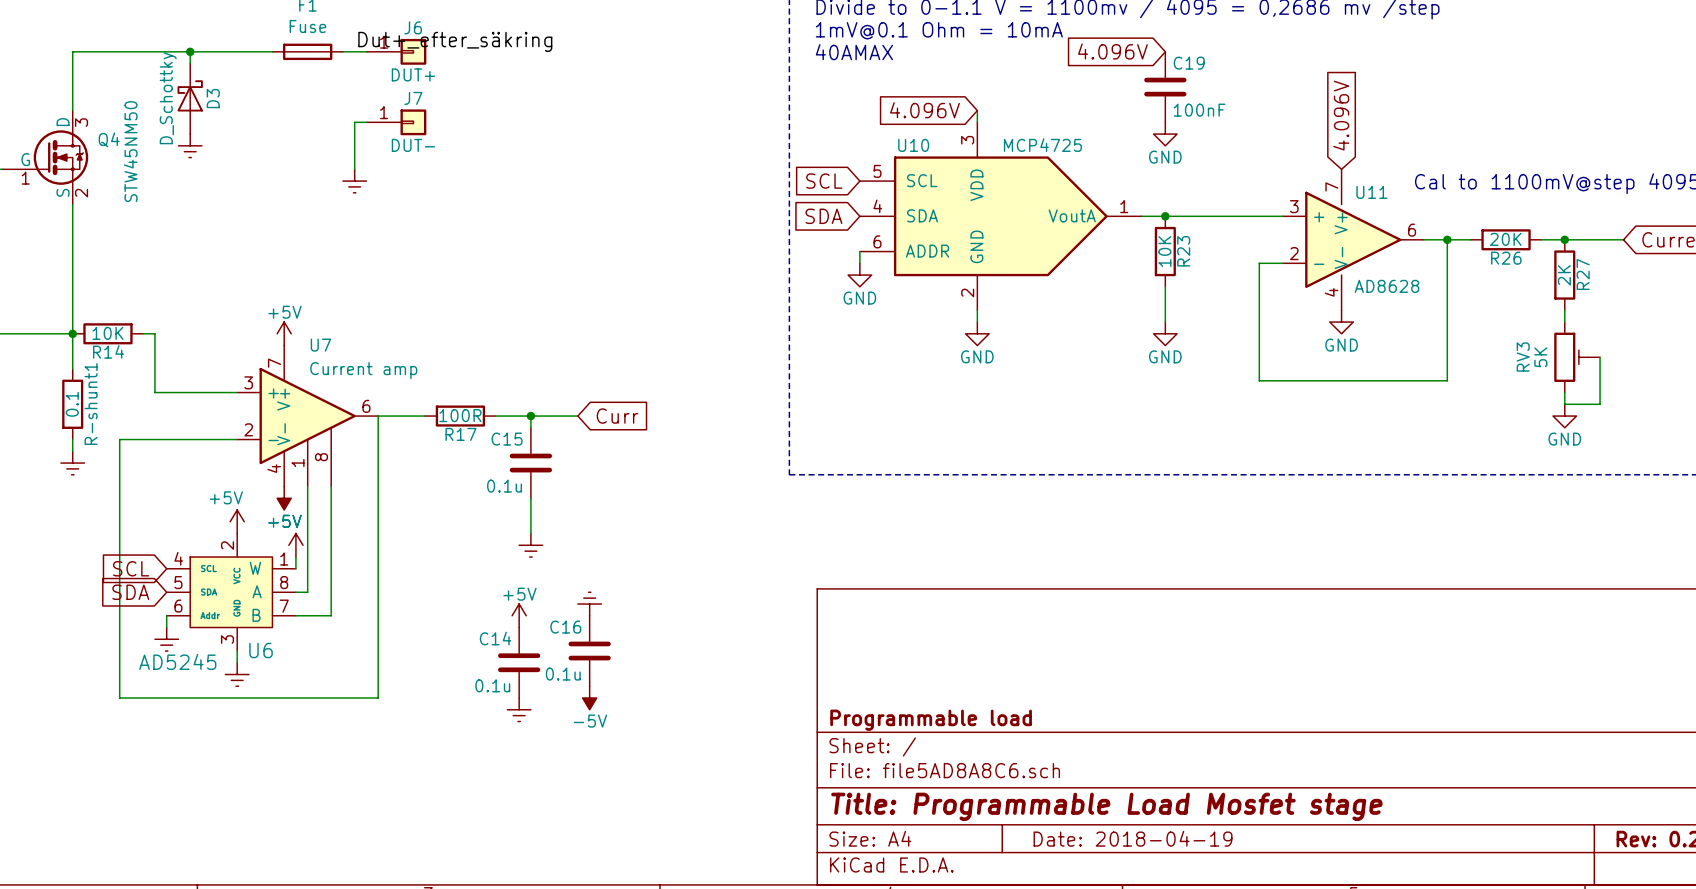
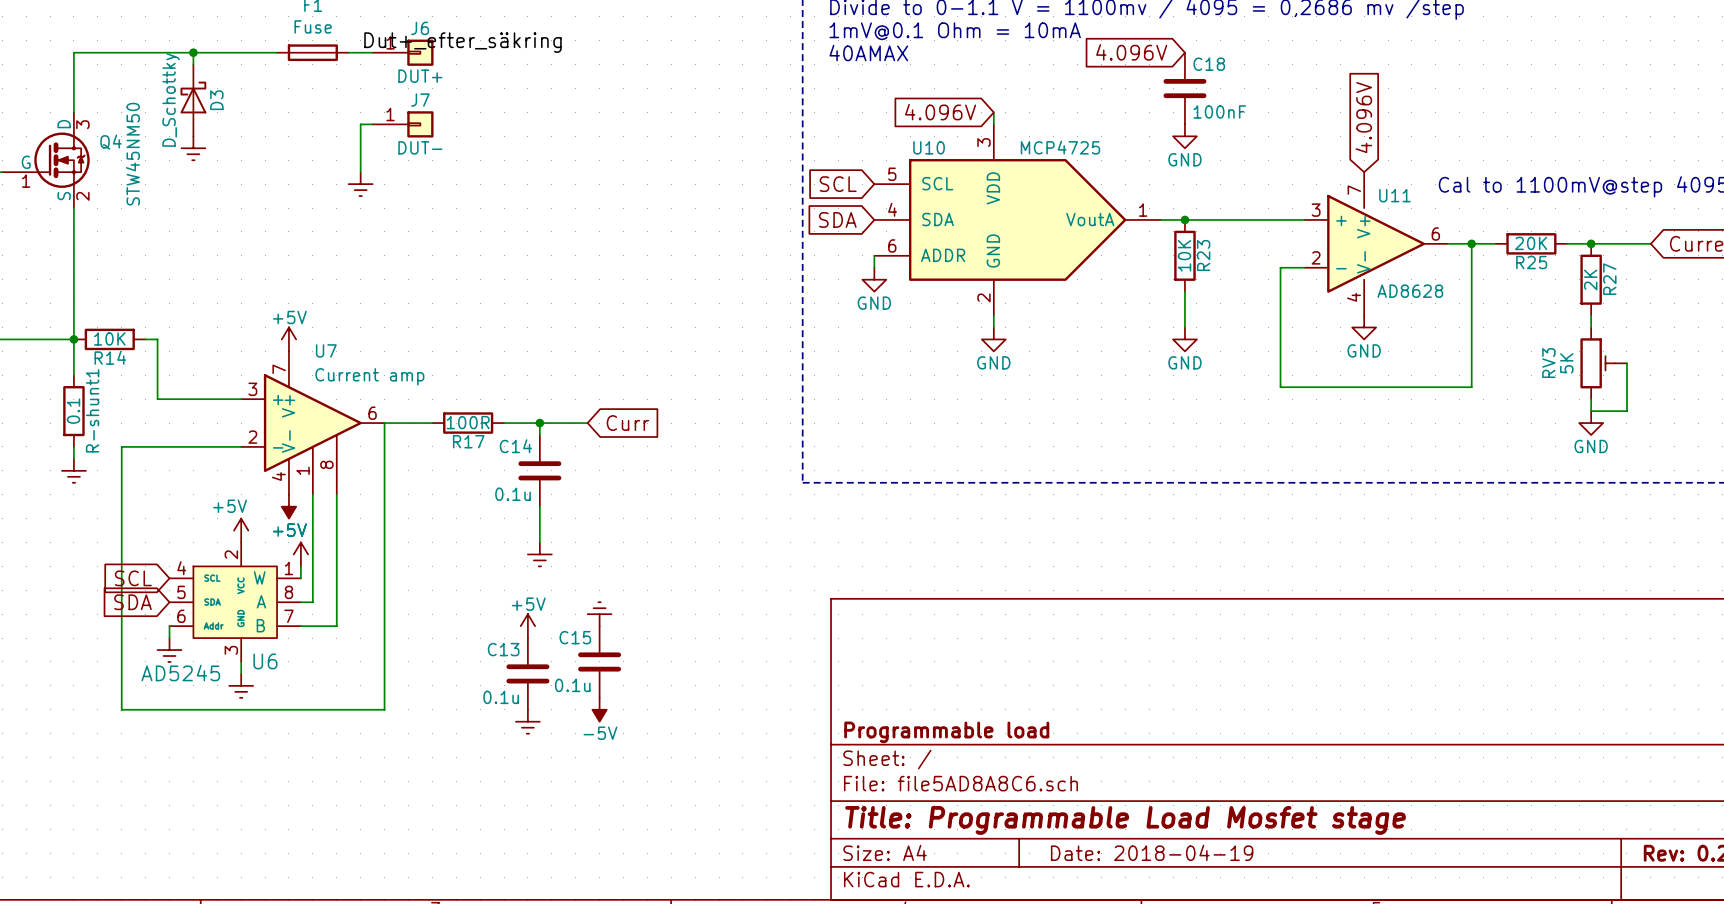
C19 name: C19 (1189, 63) -> C18 (1209, 64)
R26 name: R26 (1506, 258) -> R25 (1531, 262)
C15 name: C15 (507, 439) -> C14 (515, 446)
C16 name: C16 (565, 627) -> C15 (575, 637)
C14 name: C14 (495, 638) -> C13 (503, 649)

